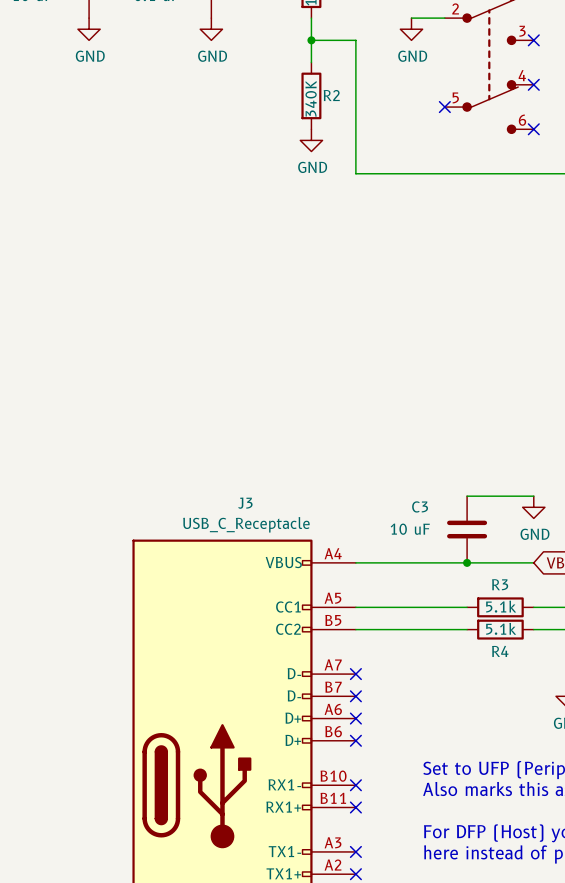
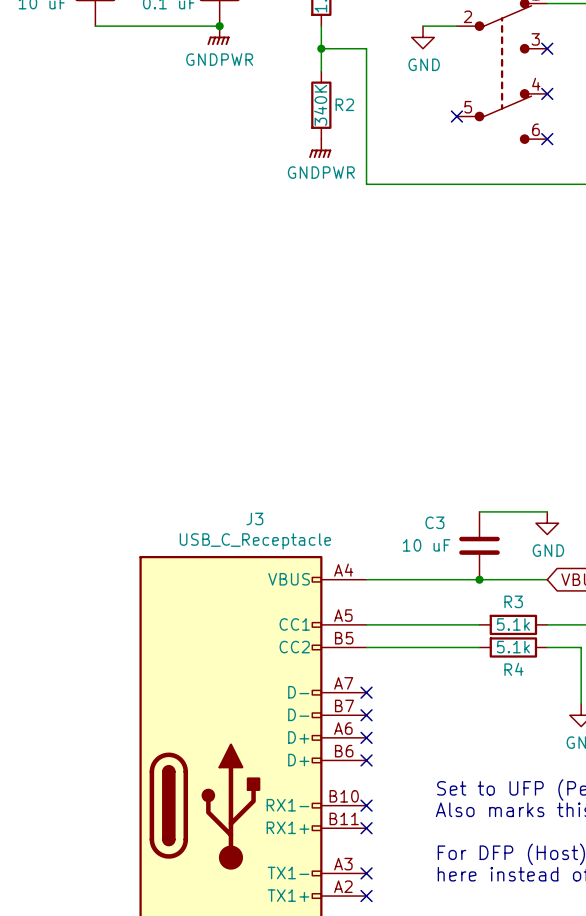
wire: none -> (95, 26) (219, 26)
junction: none -> (219, 26)
power symbol: GND (89, 29) -> none
power symbol: GND (211, 29) -> GNDPWR (218, 35)
power symbol: GND (311, 140) -> GNDPWR (320, 148)

